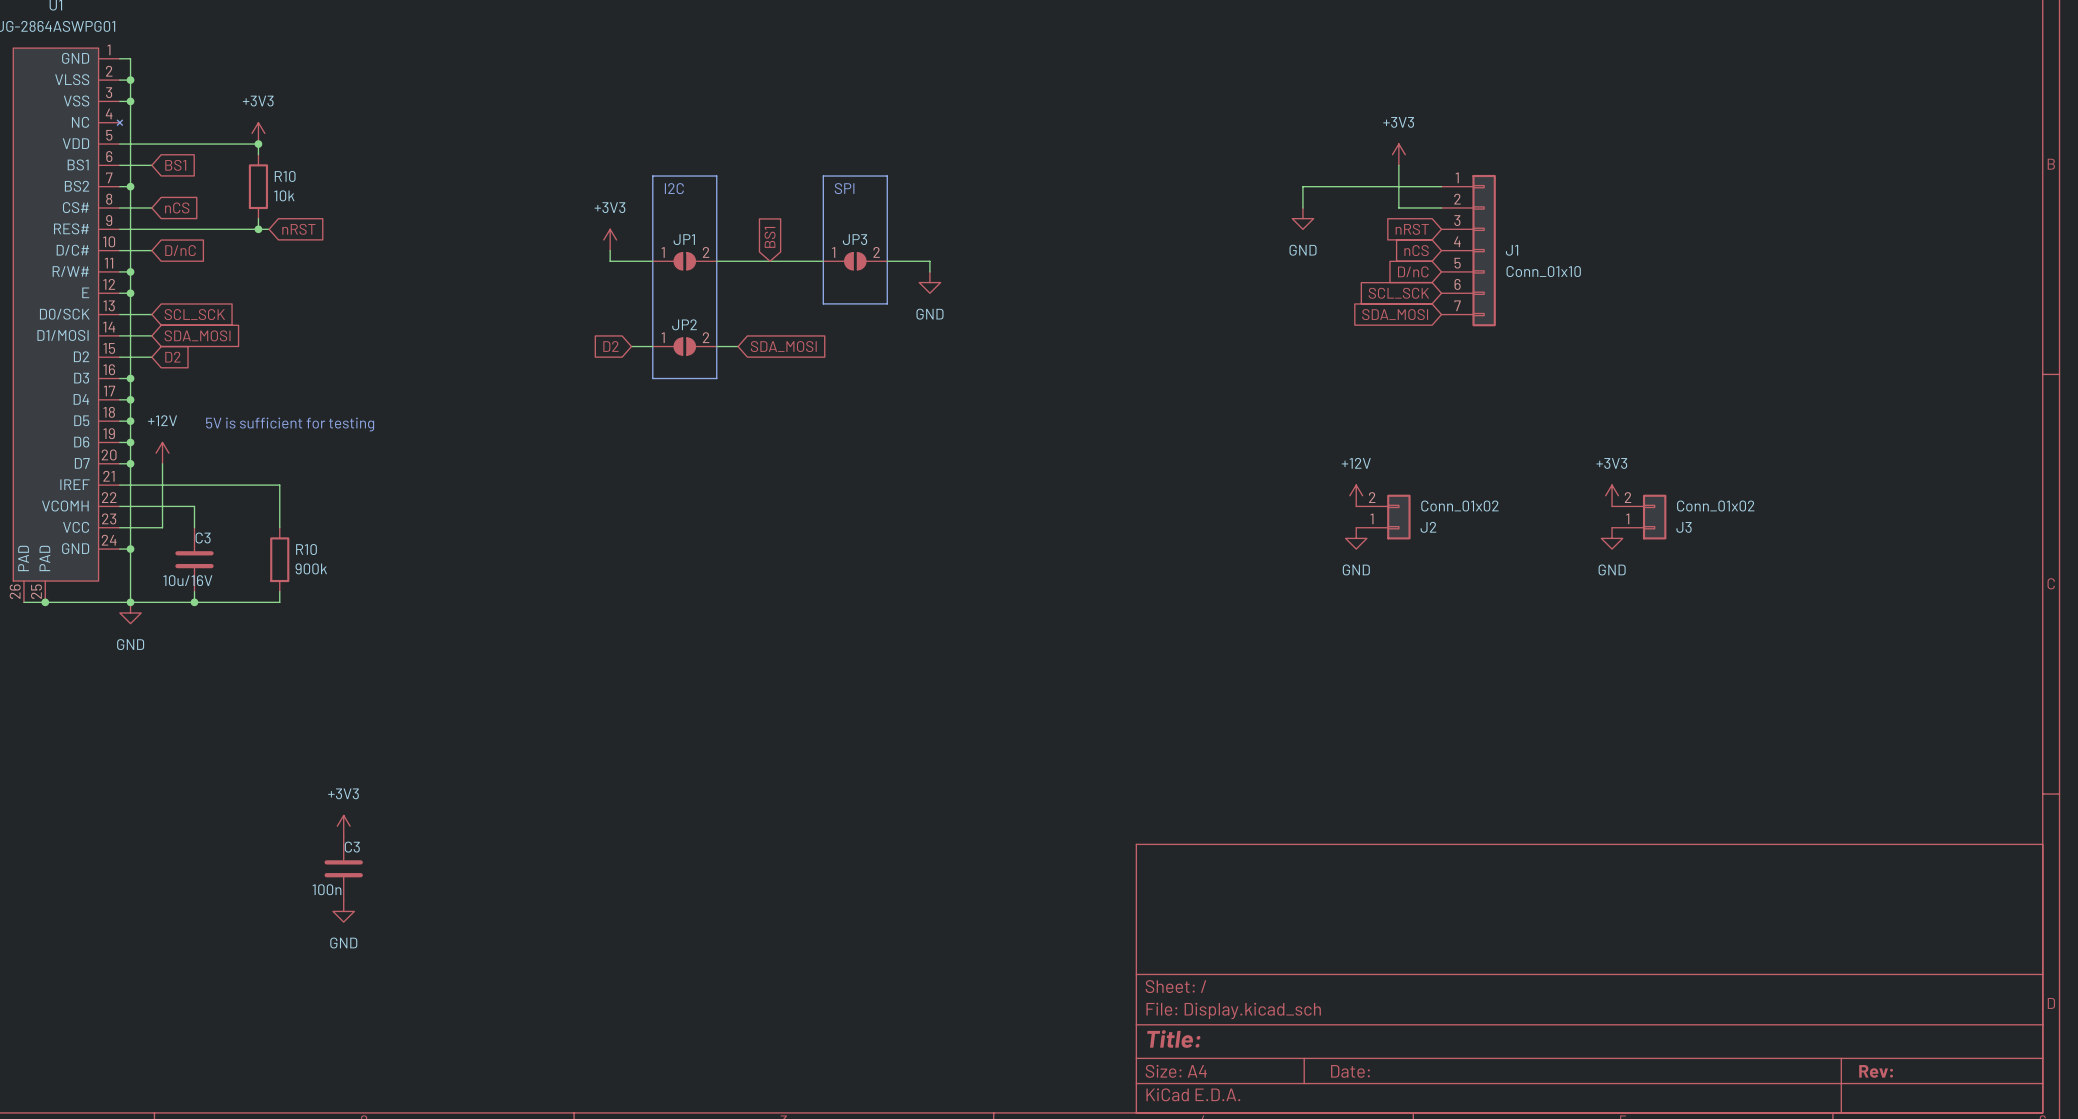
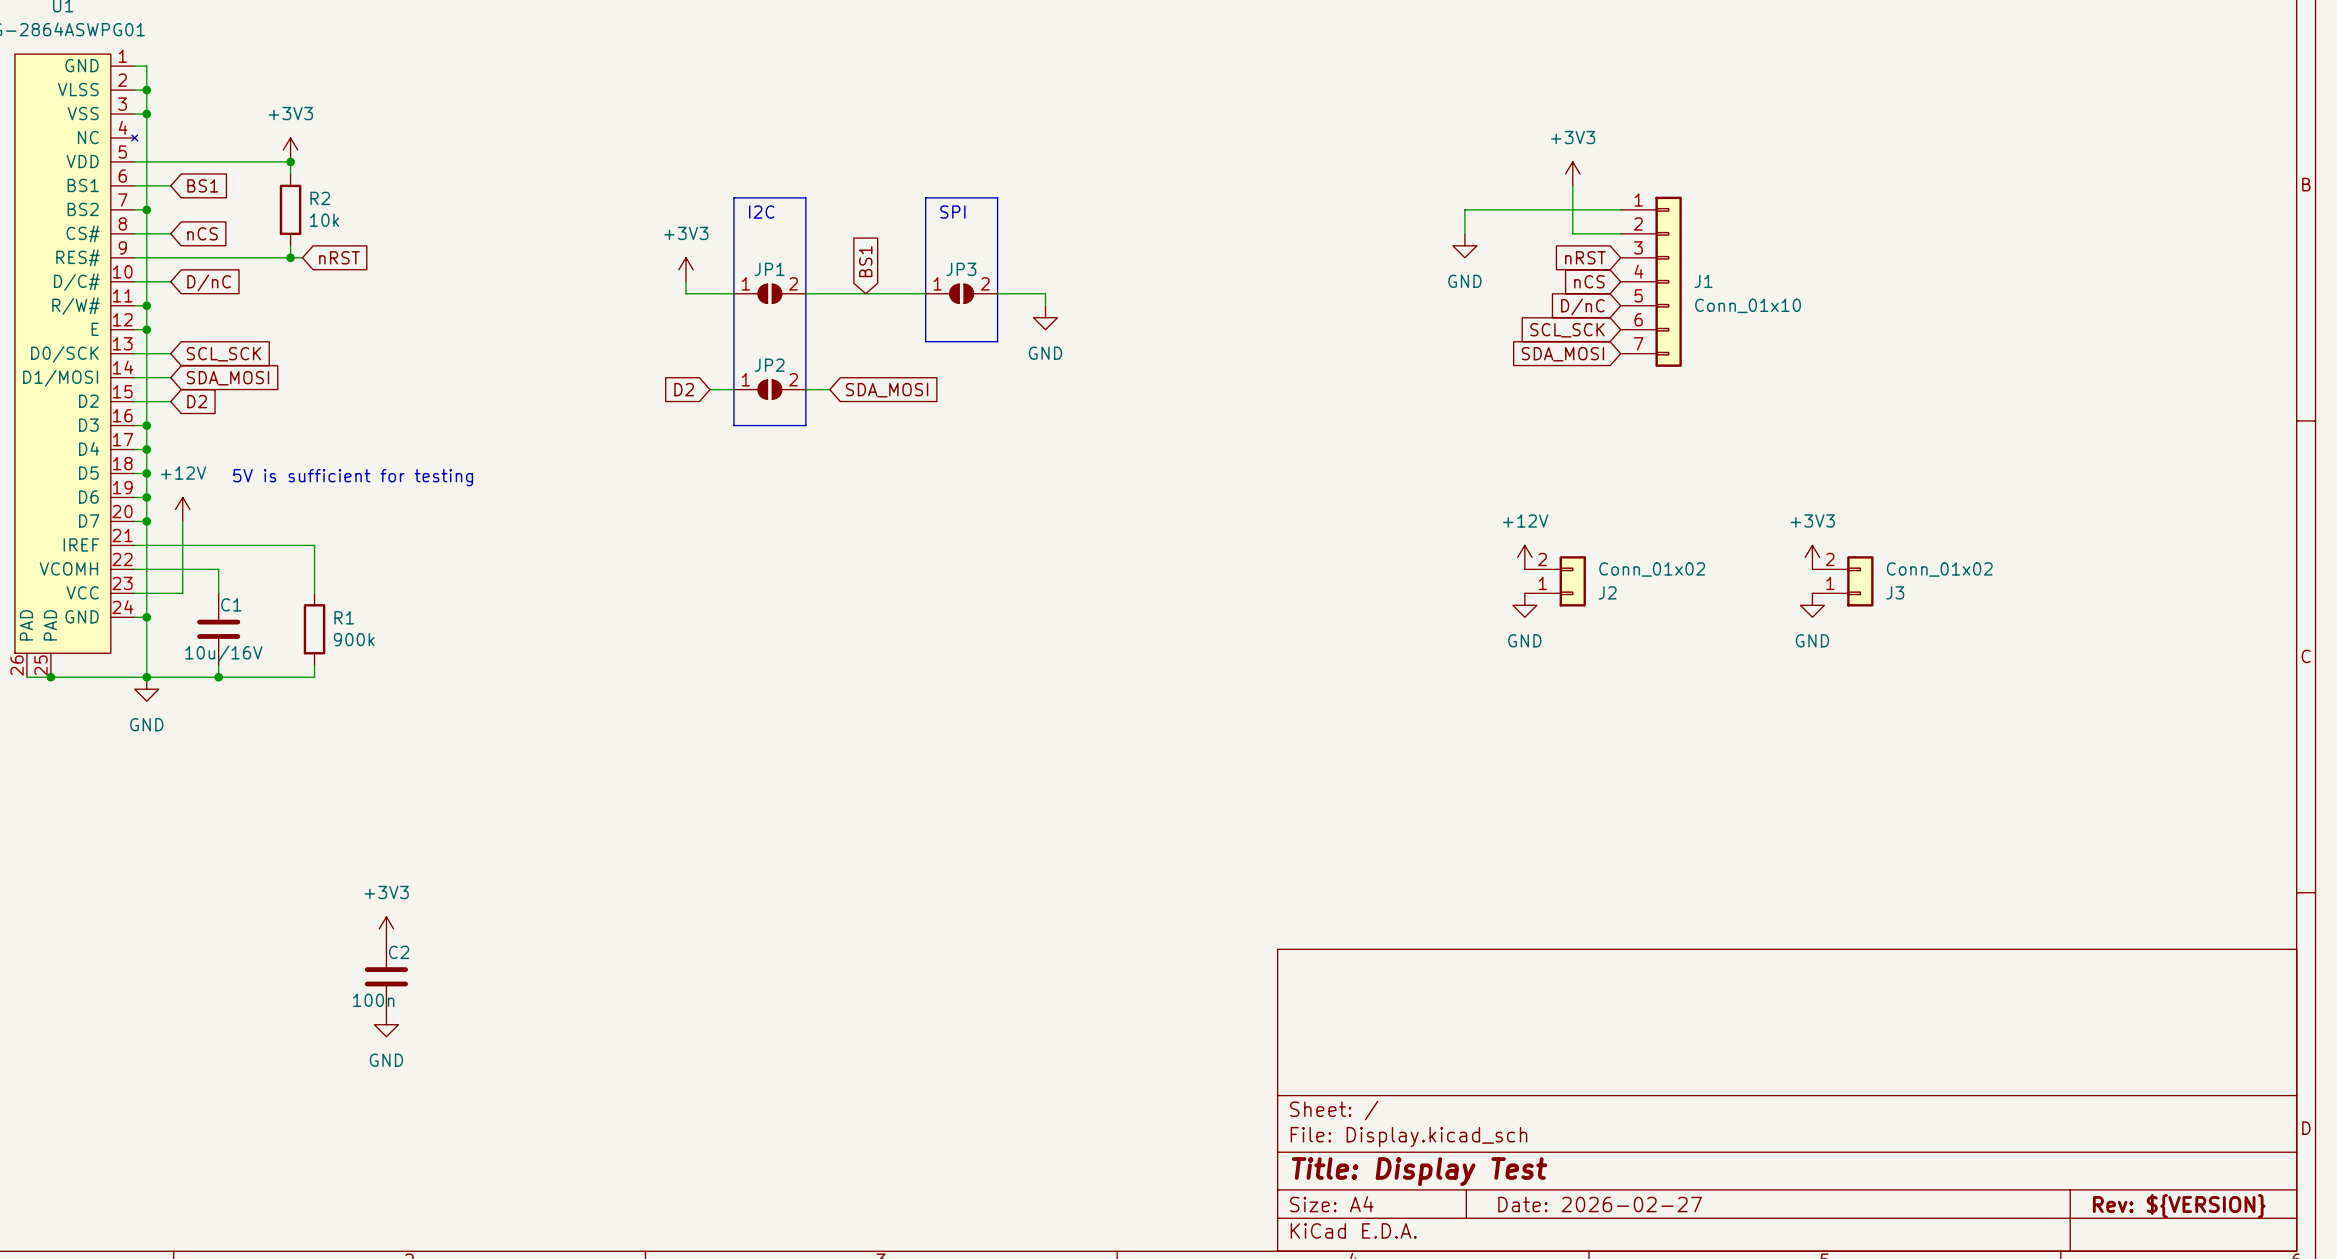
R10 name: R10 (285, 176) -> R2 (320, 198)
C3 name: C3 (203, 538) -> C1 (231, 604)
R10 name: R10 (306, 549) -> R1 (344, 617)
C3 name: C3 (352, 847) -> C2 (399, 952)
title block: Title: (1173, 1039) -> Title: Display Test (1419, 1171)
title block: Date: (1350, 1071) -> Date: 2026-02-27 (1600, 1204)
title block: Rev: (1876, 1071) -> Rev: ${VERSION} (2179, 1206)

